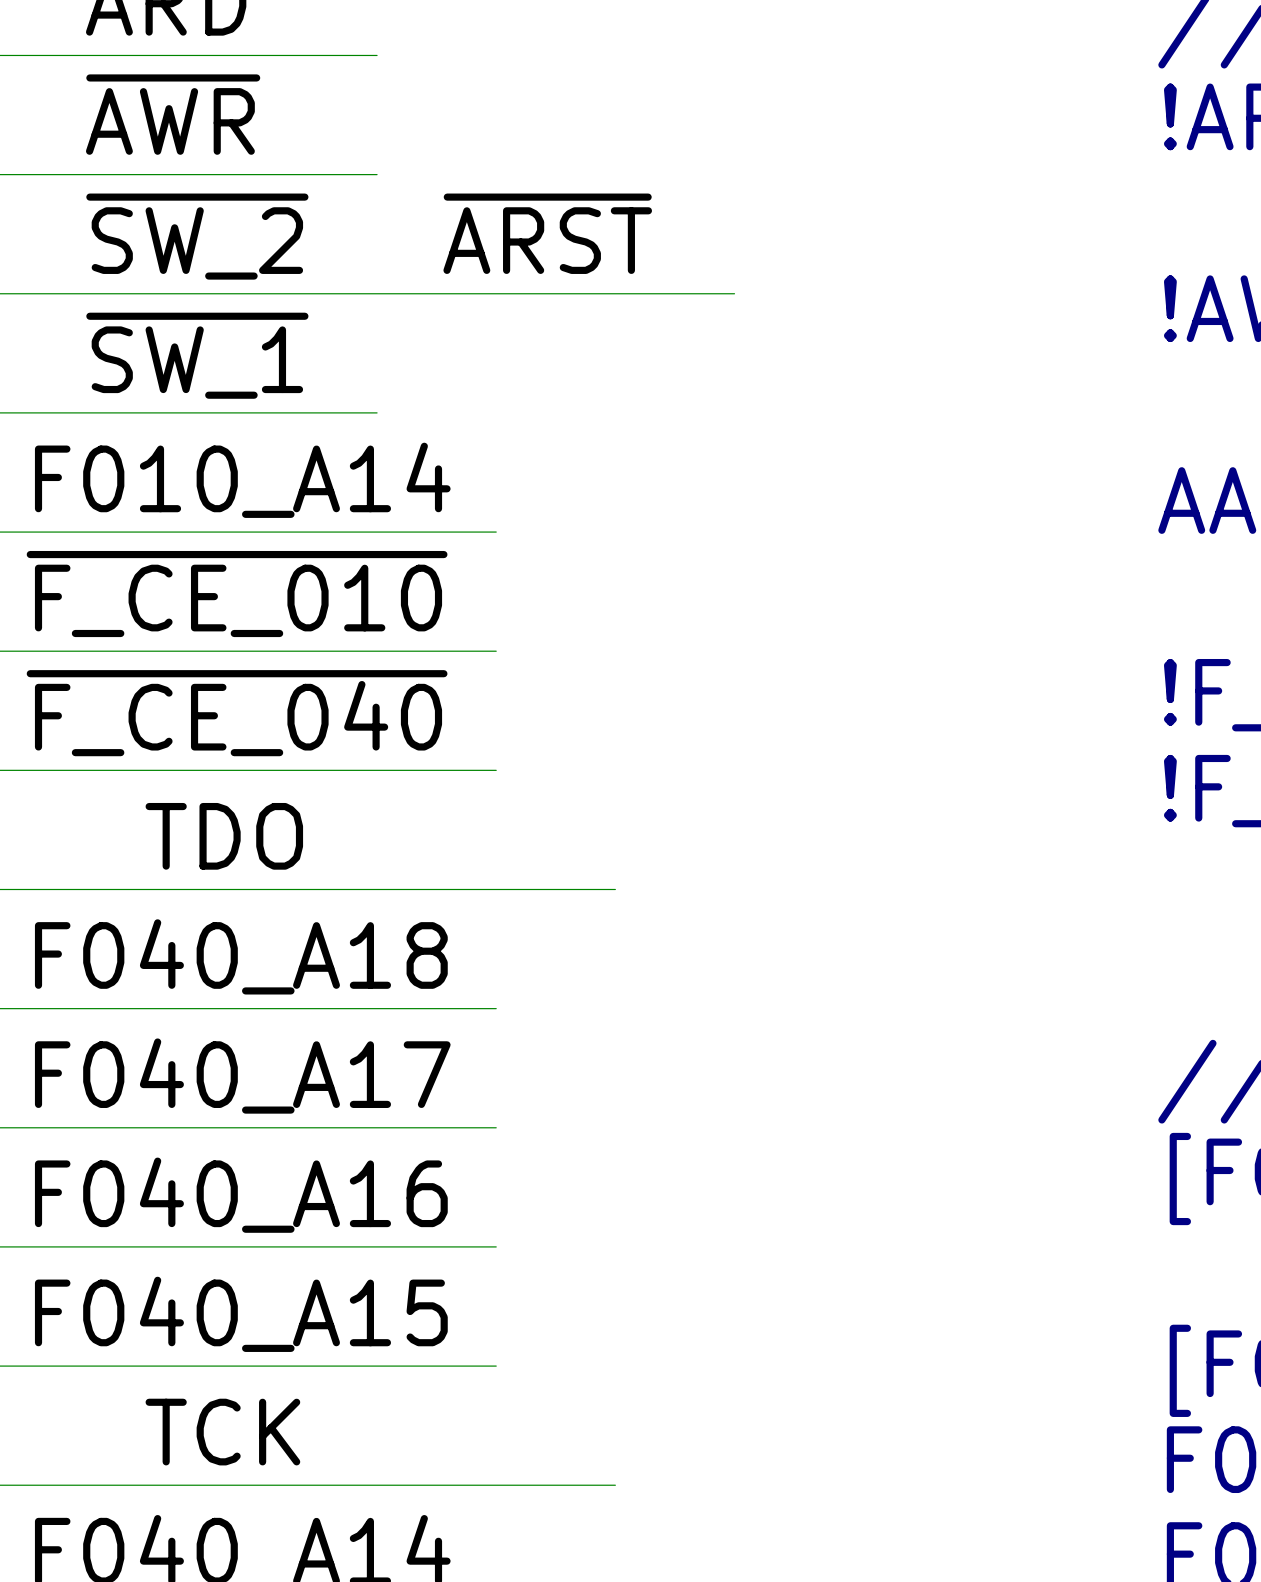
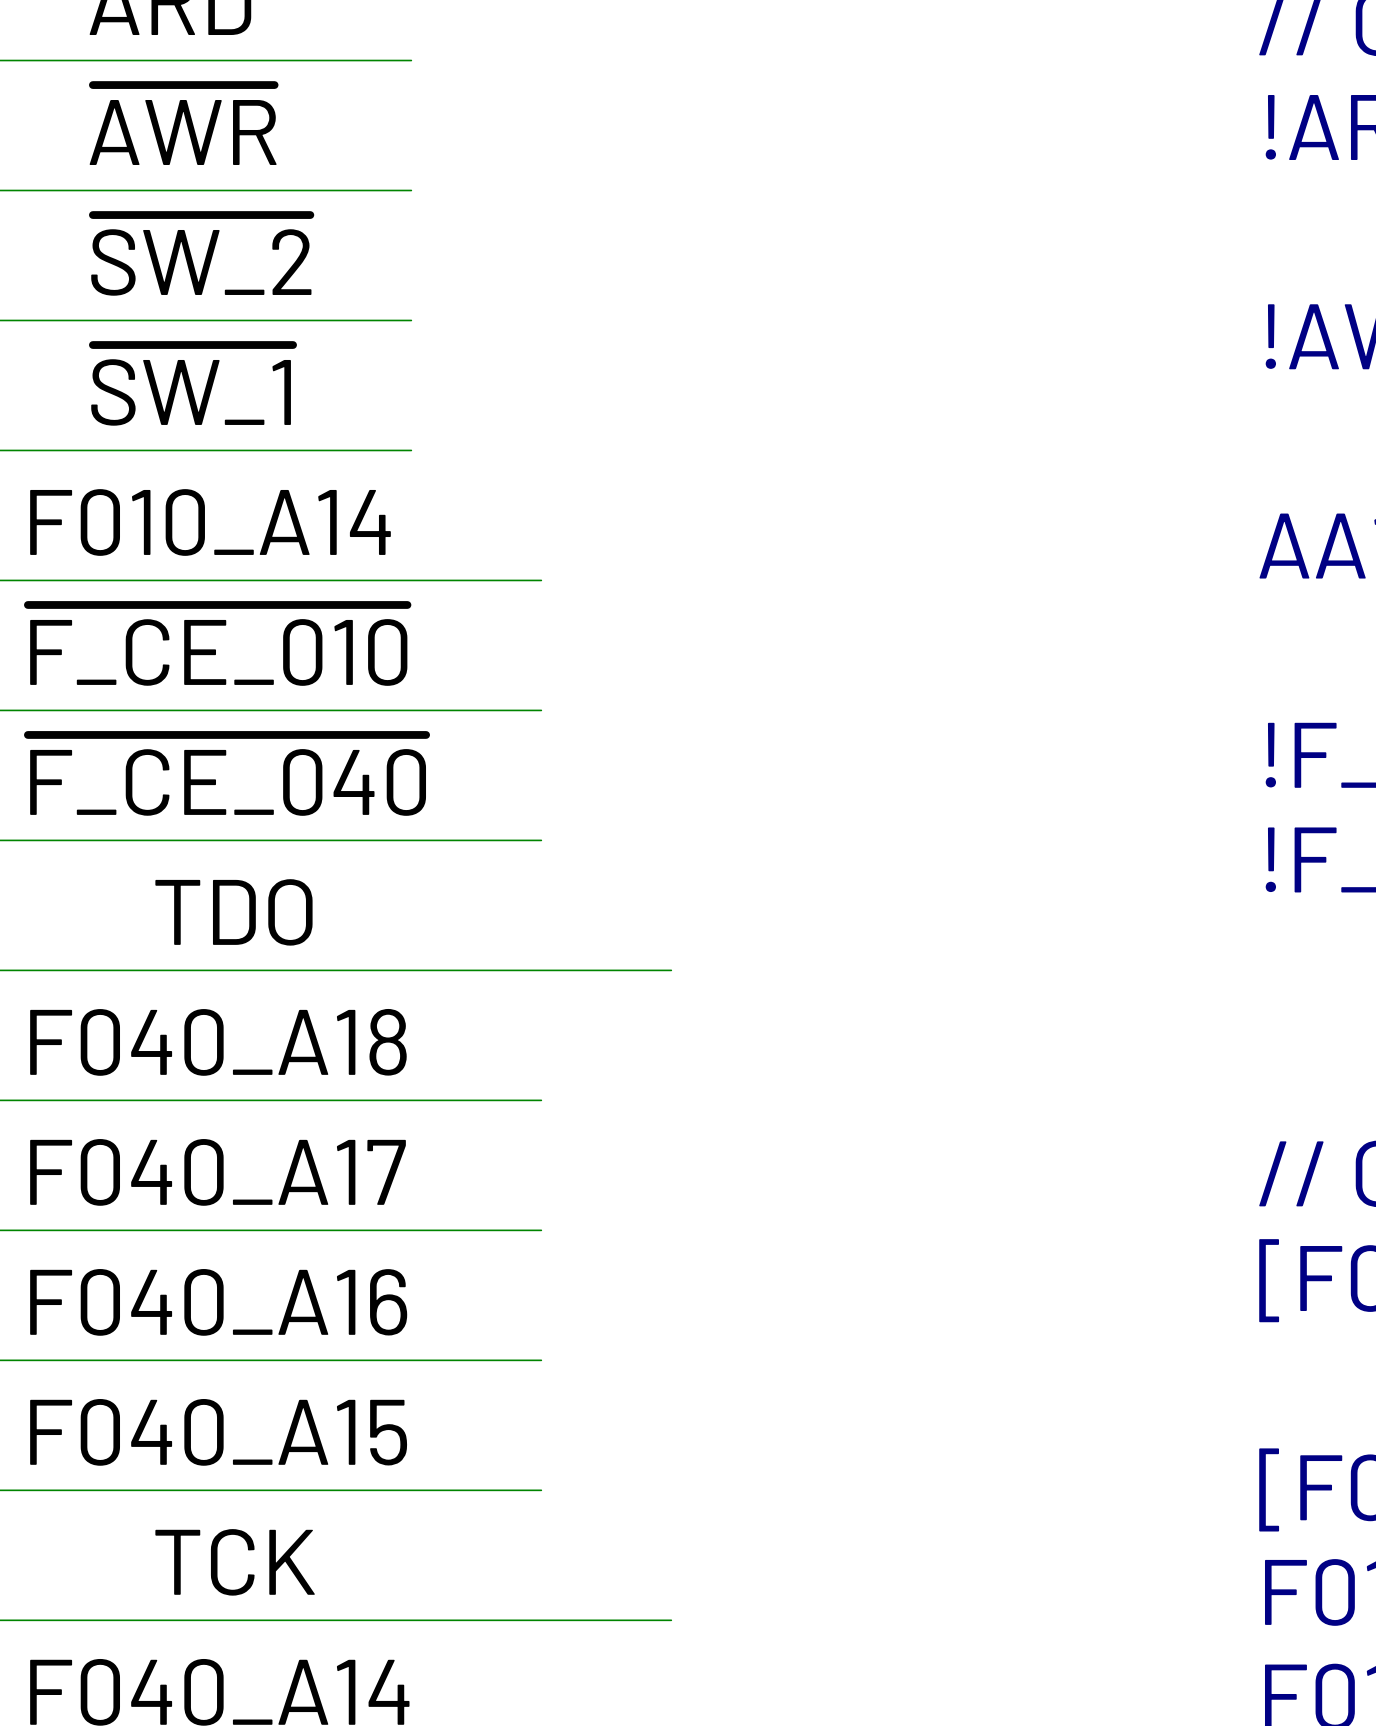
label: ~{ARST} (547, 233) -> none
wire: (377, 293) (734, 293) -> none

